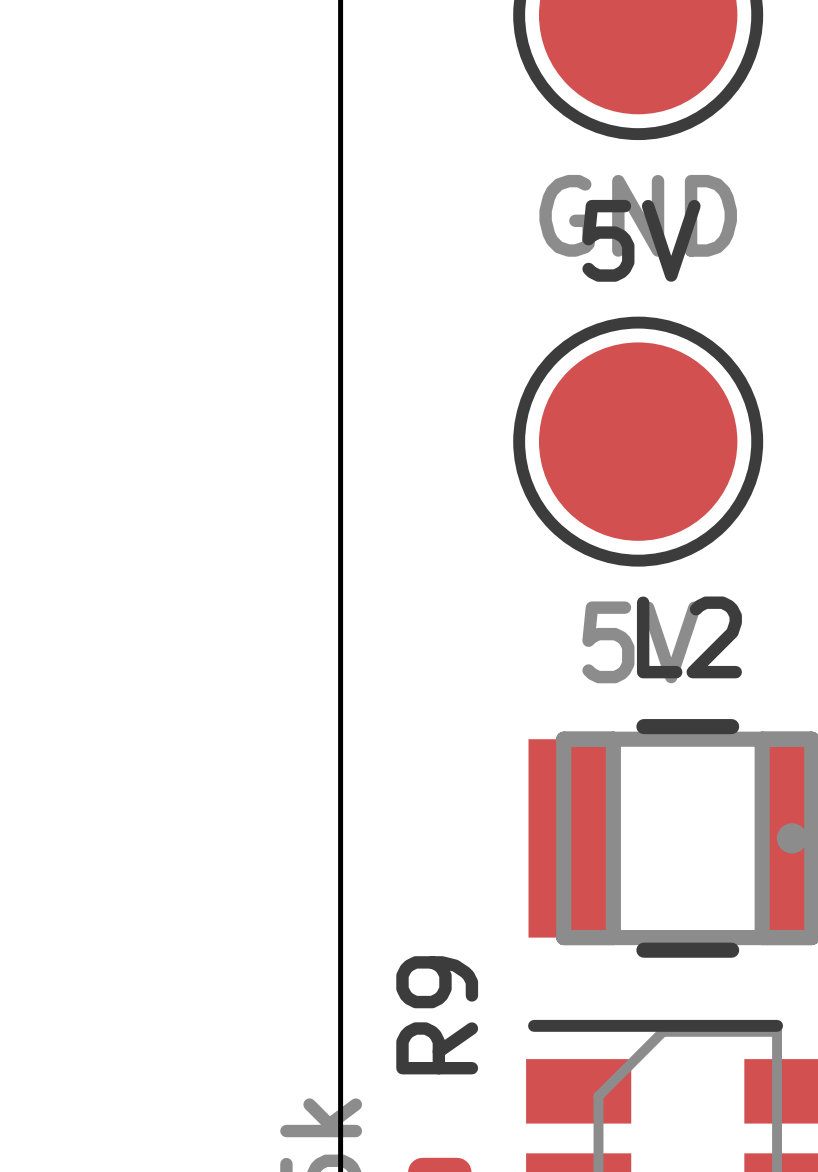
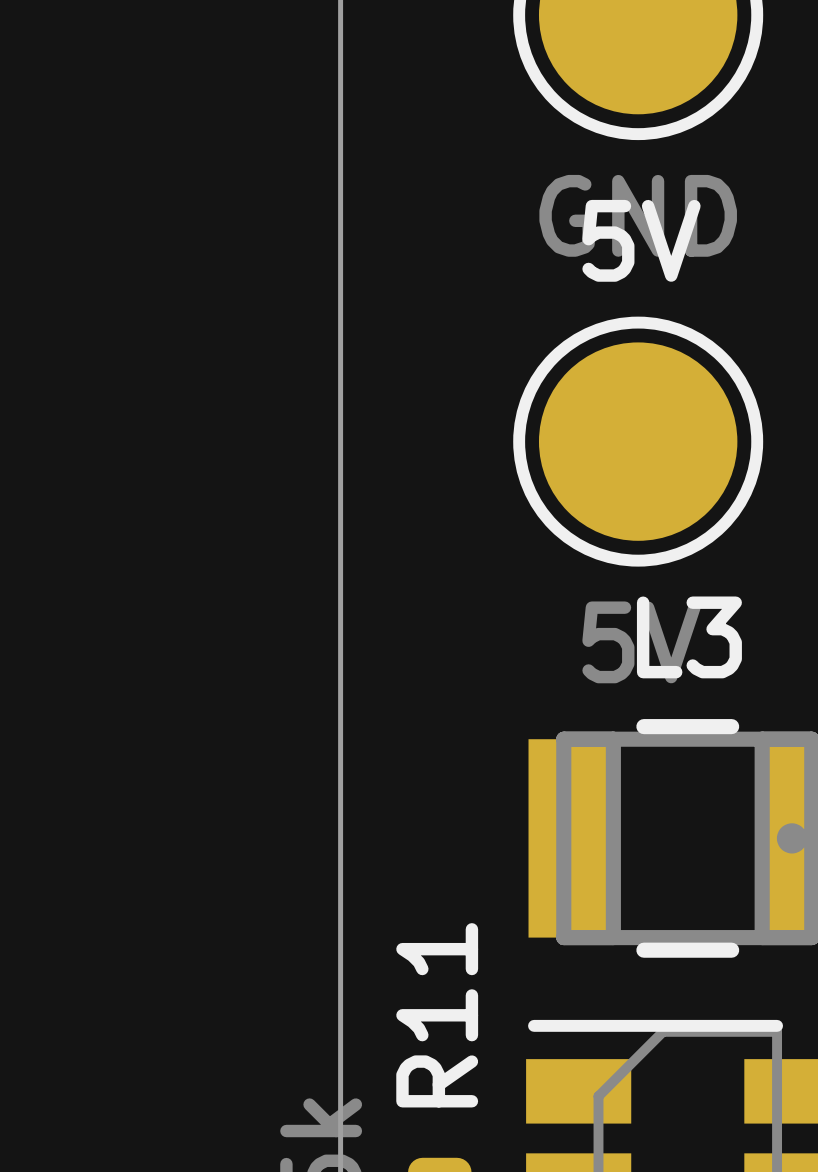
L2 name: L2 (689, 637) -> L3 (689, 637)
R9 name: R9 (437, 1015) -> R11 (437, 1015)

